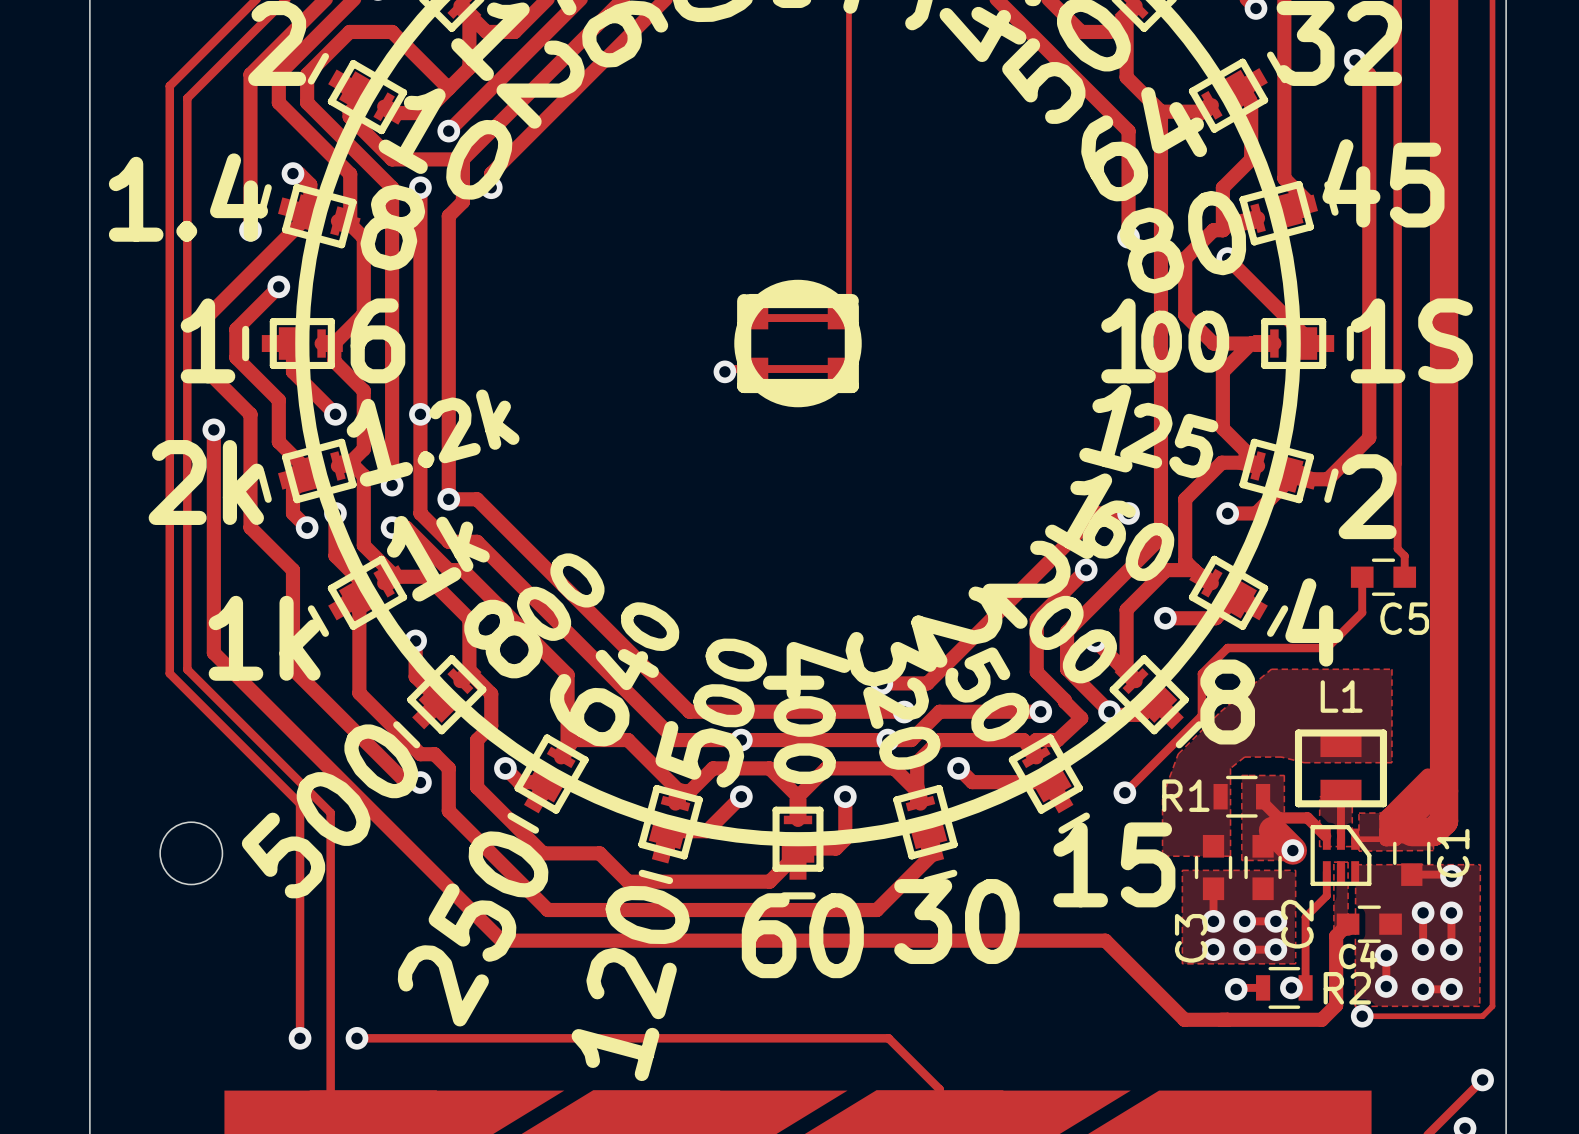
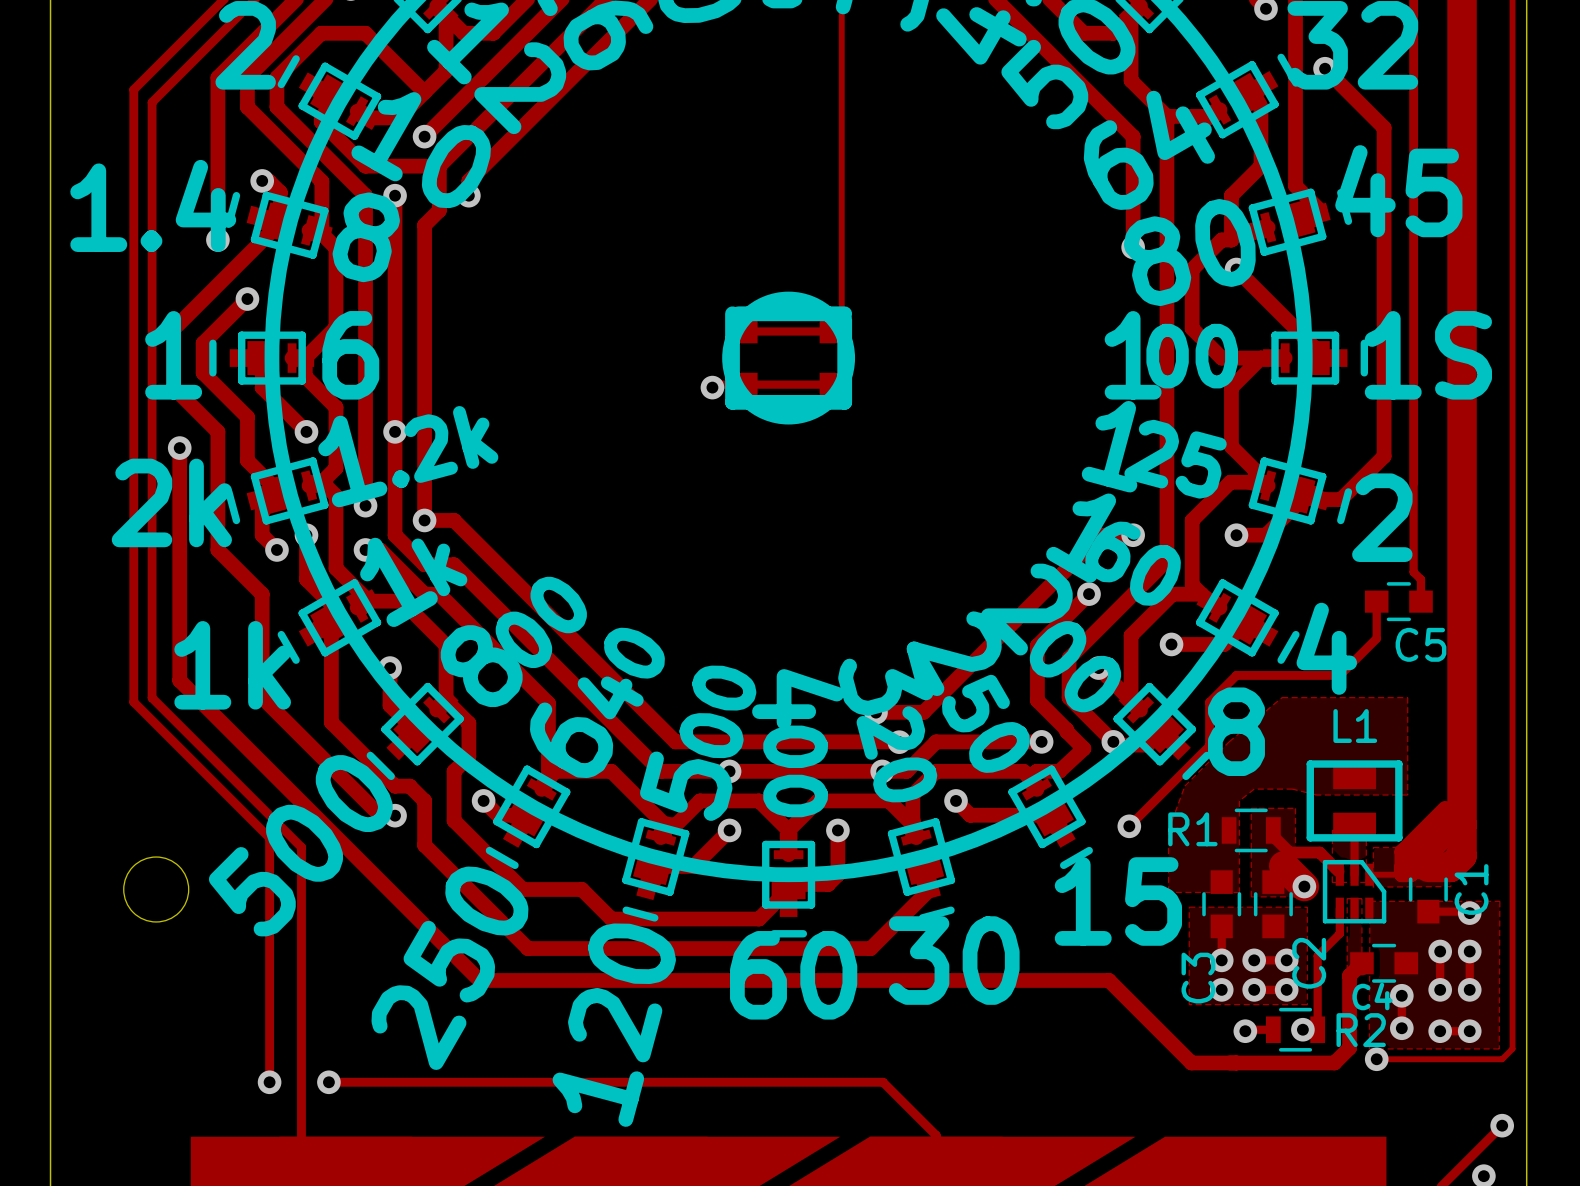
track: (1355, 60) (1369, 74) (1369, 122) -> (1325, 68) (1384, 127)
via position: (1355, 60) -> (1325, 68)

